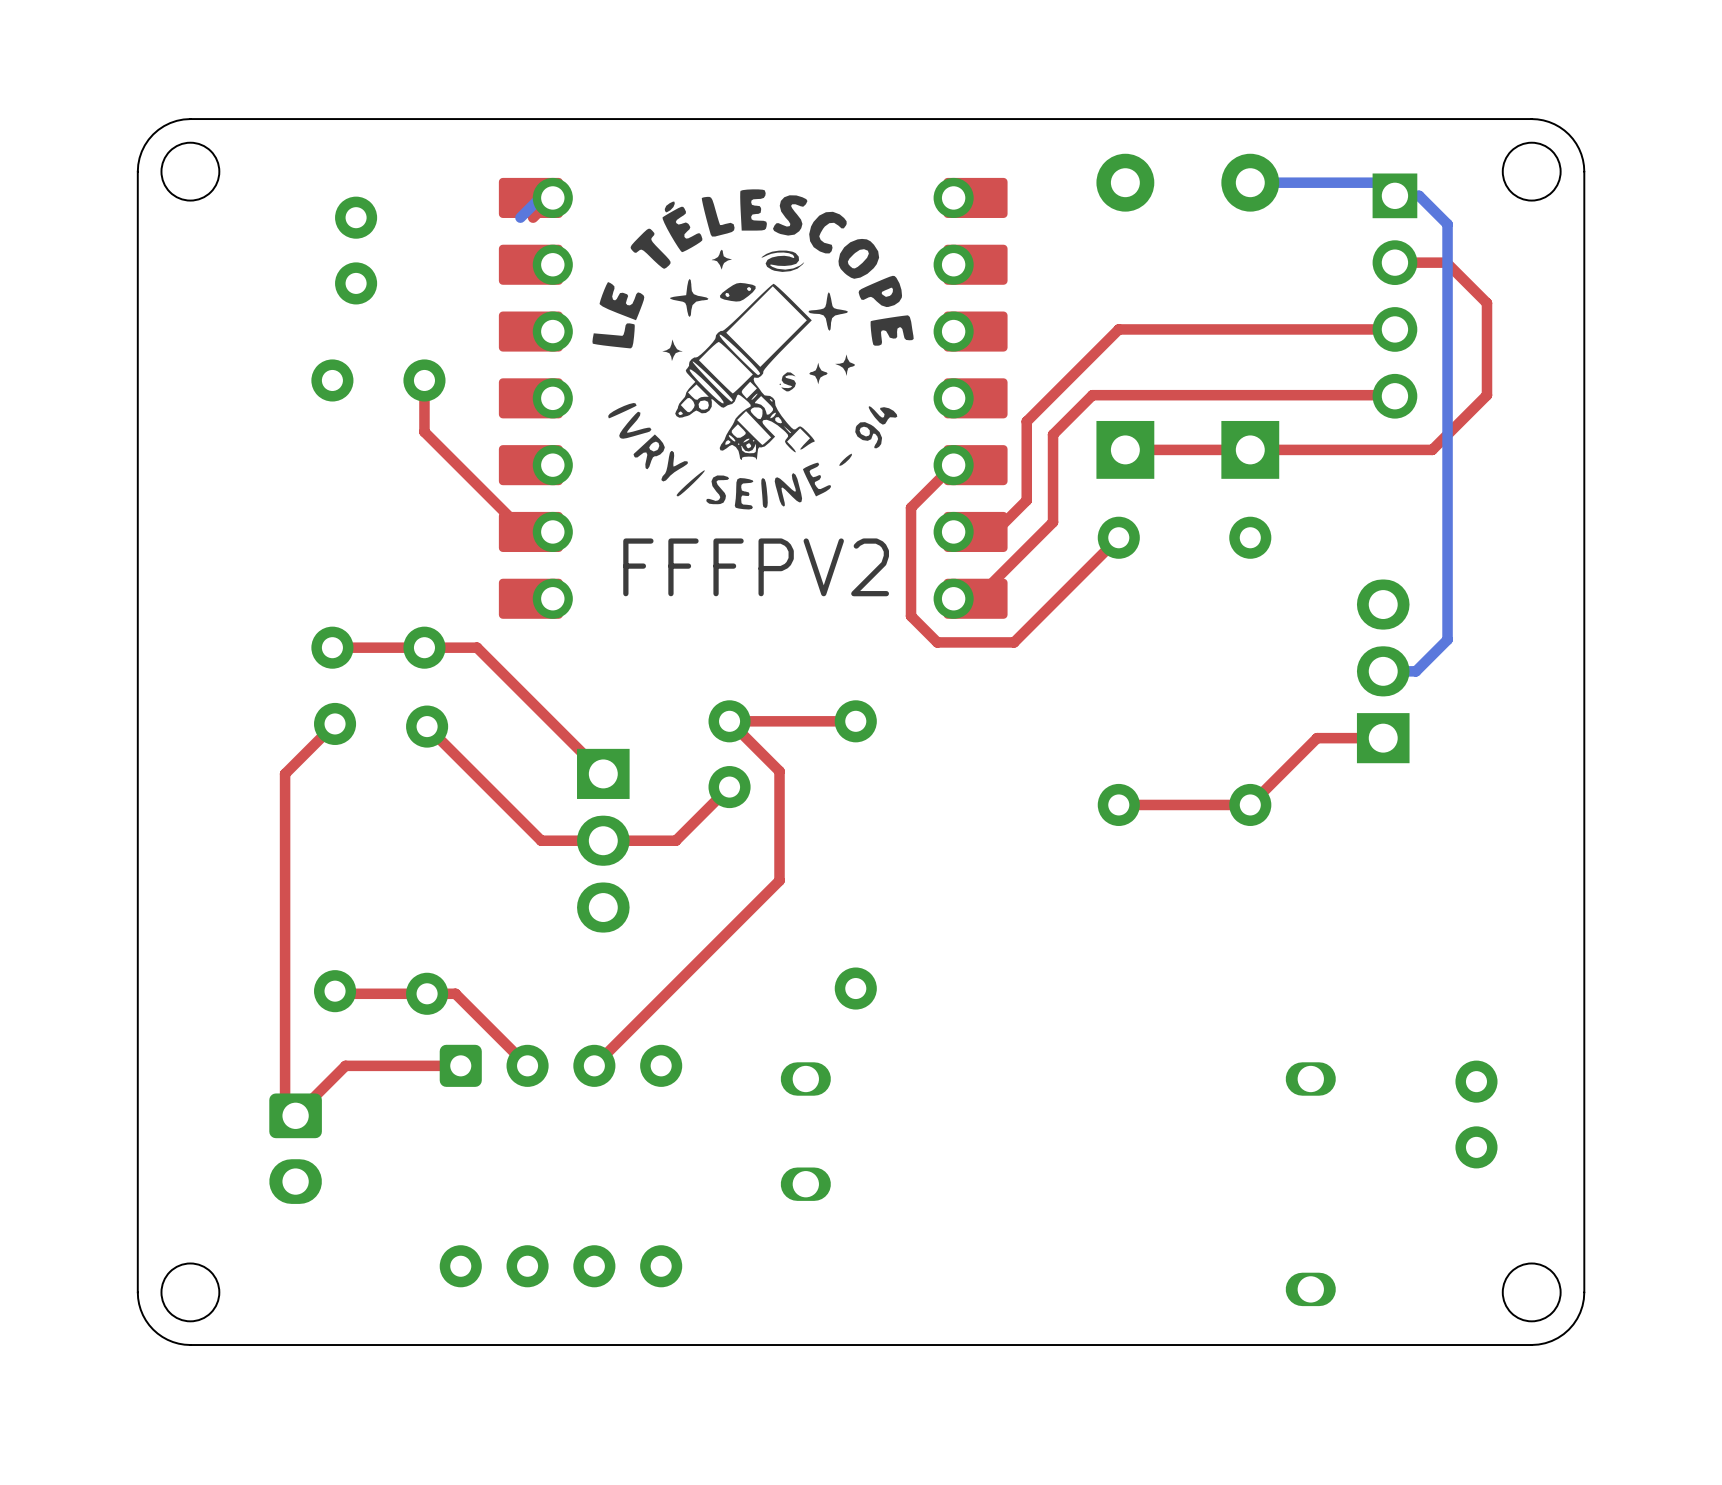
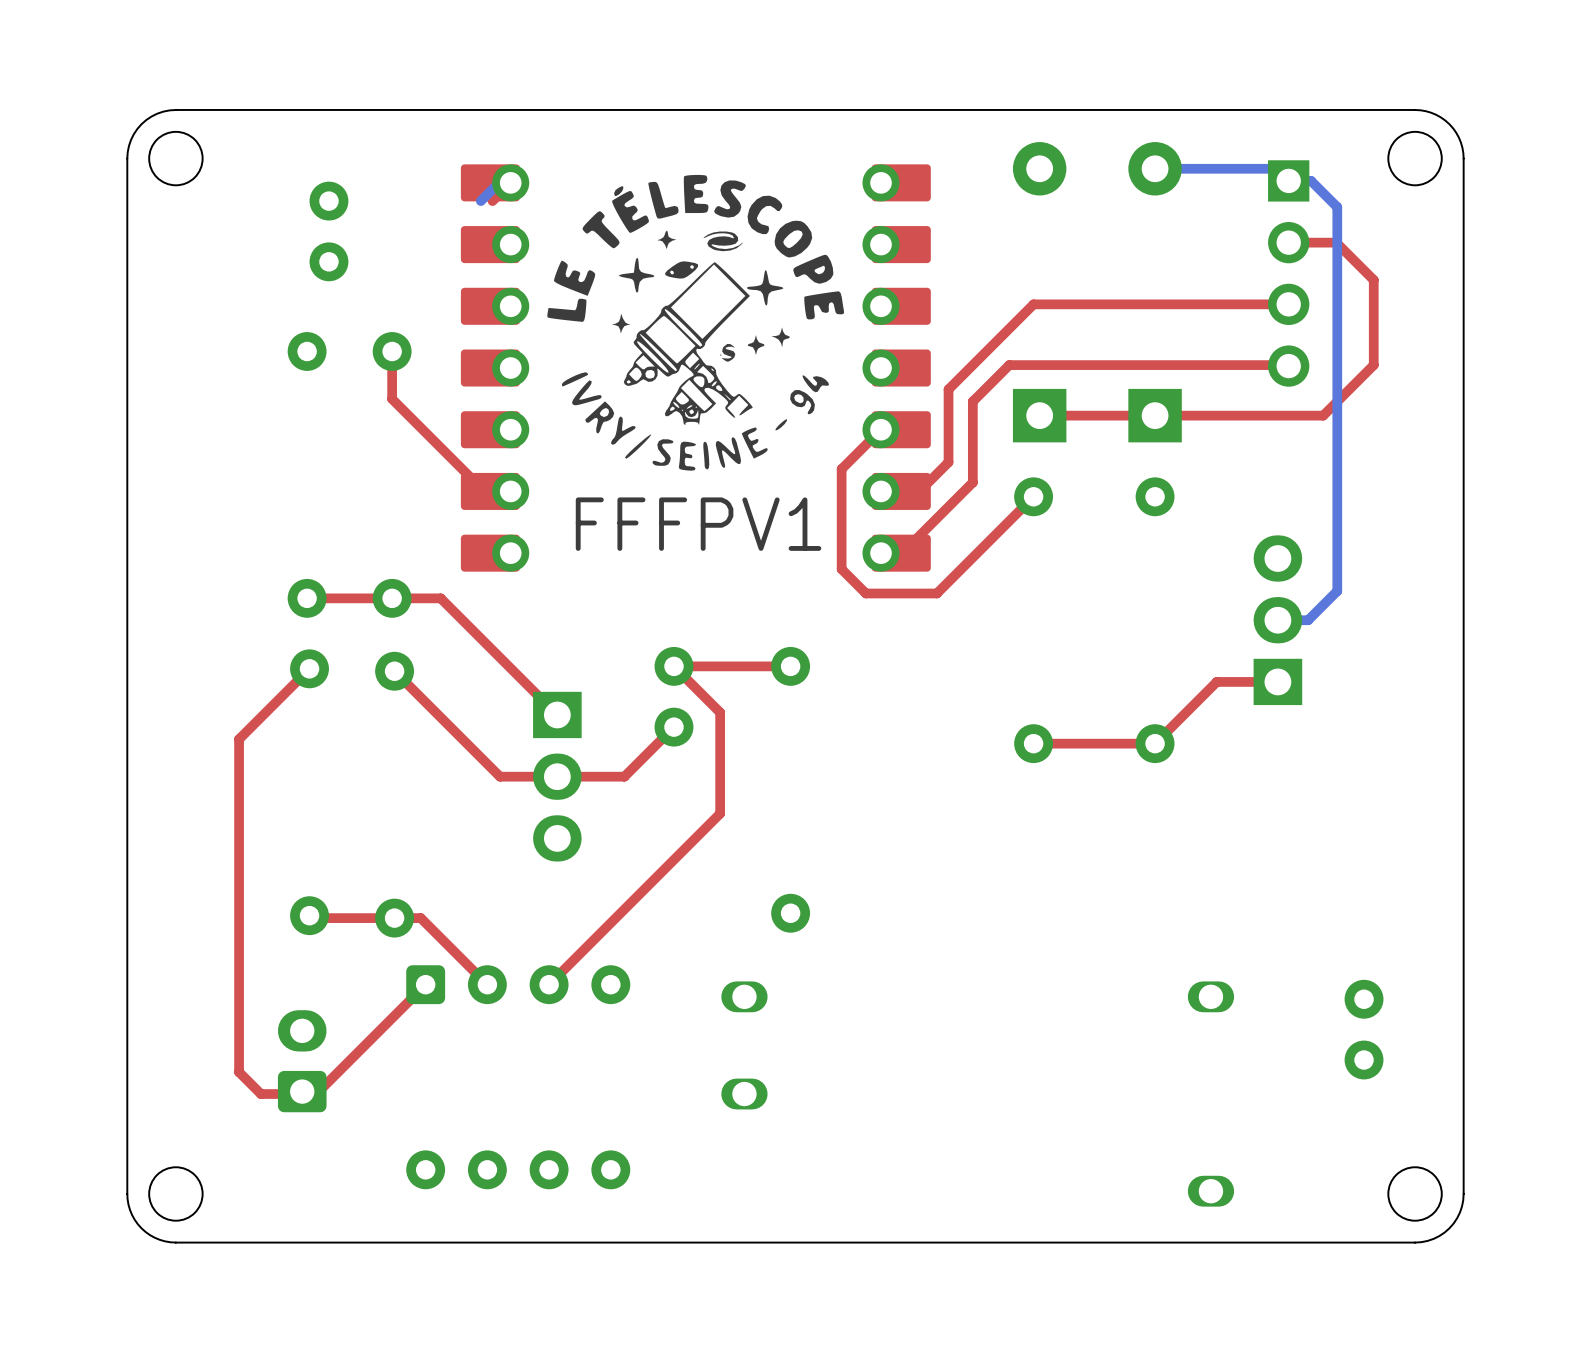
text: FFFPV2 (756, 567) -> FFFPV1 (698, 524)
top track: (285, 773) (285, 1105) (295, 1115) (345, 1065) (460, 1065) -> (263, 714) (239, 739) (239, 1072) (260, 1094) (299, 1094) (302, 1091) (318, 1091) (425, 984)
part rotation: 0° (295, 1148) -> 180° (302, 1061)

